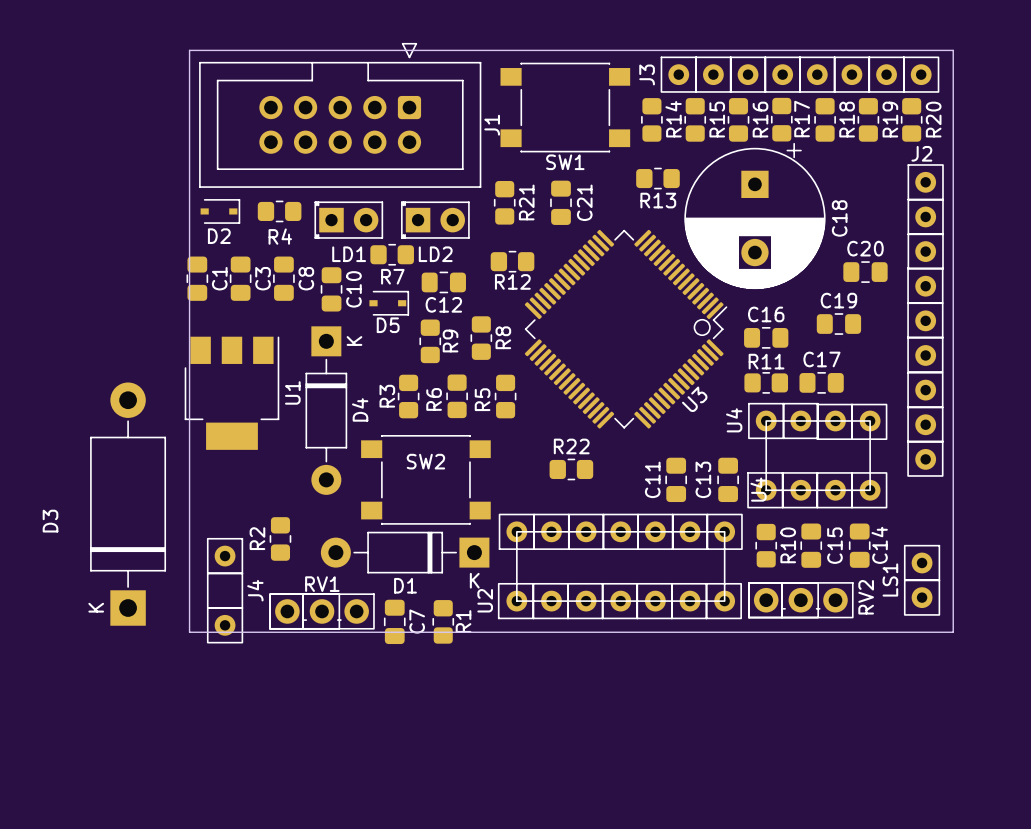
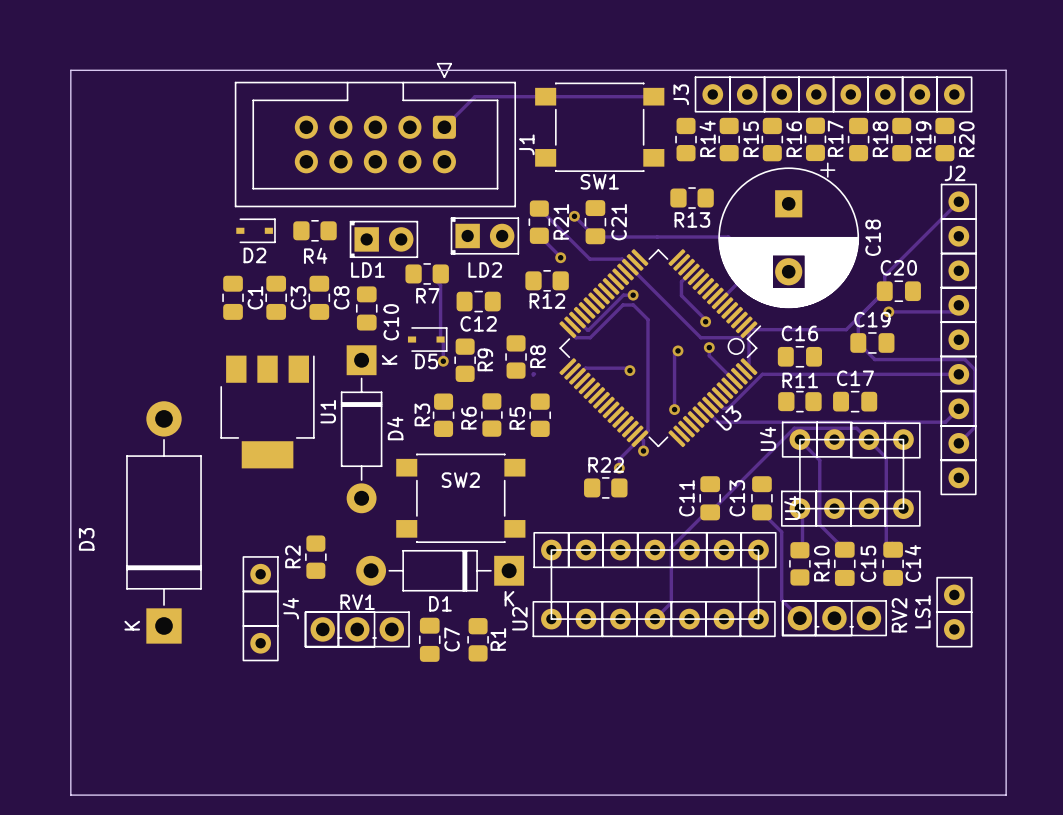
board edge: (189, 50) (189, 632) (953, 632) (953, 50) -> (225, 70) (70, 70) (70, 795) (1006, 795) (1006, 70) (986, 70)
track: none -> (653, 96) (475, 96) (444, 127)
track: none -> (958, 201) (884, 275) (884, 291) (846, 329) (748, 329)
track: none -> (539, 208) (589, 259) (622, 259) (700, 337) (740, 337) (748, 329)
track: none -> (574, 216) (596, 237) (728, 237) (753, 261) (753, 267) (720, 300)
via: none -> (574, 216)
track: none -> (539, 235) (560, 257)
LD2 position: (435, 220) -> (484, 235)
via: none -> (560, 257)
track: none -> (691, 272) (681, 281) (681, 295) (705, 321)
LD1 name position: LD1 (349, 254) -> LD1 (367, 269)
track: none -> (436, 280) (440, 285) (440, 339) (443, 342) (443, 361)
track: none -> (633, 295) (623, 295) (588, 330) (577, 320)
via: none -> (633, 295)
track: none -> (958, 305) (952, 311) (888, 311)
C10 name position: C10 (353, 289) -> C10 (391, 322)
via: none -> (888, 311)
track: none -> (858, 317) (858, 342) (874, 359) (964, 359) (975, 369) (975, 427) (958, 443)
via: none -> (705, 321)
D5 position: (389, 303) -> (427, 339)
track: none -> (567, 329) (575, 337) (590, 337) (623, 305) (633, 305) (647, 319) (647, 430) (619, 459) (619, 468)
track: none -> (748, 329) (748, 366)
track: none -> (709, 347) (709, 355) (734, 381)
via: none -> (709, 347)
track: none -> (678, 350) (674, 354) (674, 409)
via: none -> (678, 350)
via: none -> (443, 361)
track: none -> (629, 370) (627, 368) (585, 368) (577, 376)
via: none -> (629, 370)
track: none -> (534, 374) (533, 375)
track: none -> (958, 374) (762, 374) (728, 408) (723, 408) (715, 400)
via: none -> (674, 409)
track: none -> (958, 408) (945, 422) (718, 422) (705, 409)
track: none -> (639, 438) (643, 440) (643, 450)
track: none -> (802, 443) (819, 460) (819, 524) (844, 549)
via: none -> (643, 450)
via: none -> (619, 468)
track: none -> (802, 512) (802, 543) (795, 550)
track: none -> (761, 512) (781, 532) (781, 599) (799, 618)
track: none -> (893, 549) (886, 542) (886, 457) (856, 428) (794, 428) (710, 512) (706, 512) (671, 547) (671, 602) (654, 619)
LS1 position: (922, 580) -> (954, 612)

